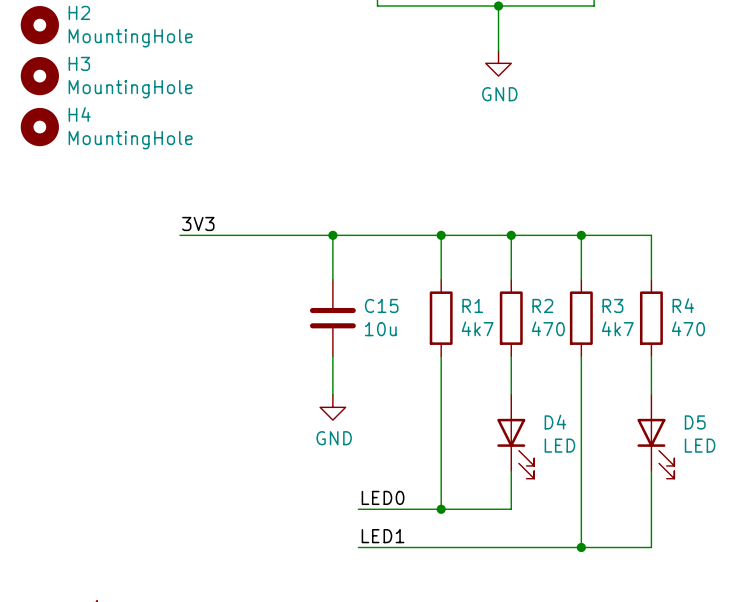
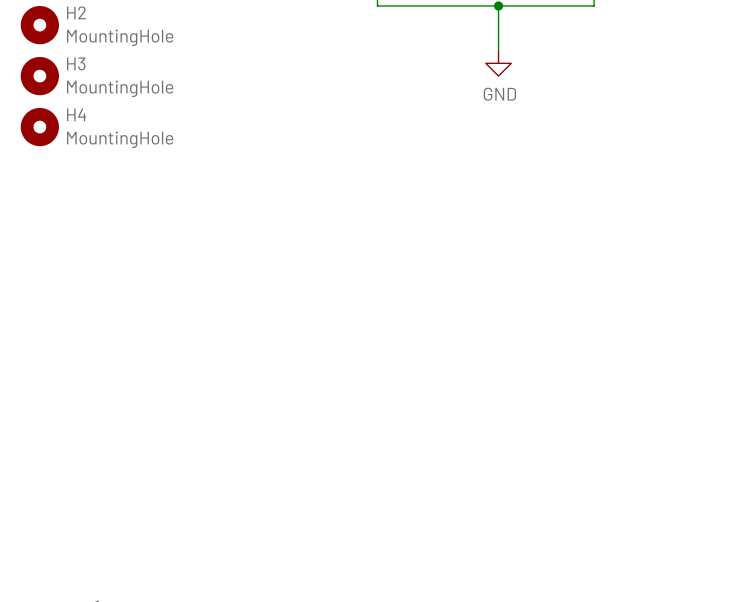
label: 3V3 (198, 223) -> none
wire: (180, 235) (651, 235) (651, 279) -> none
wire: (332, 235) (332, 279) -> none
junction: (332, 235) -> none
wire: (441, 235) (441, 279) -> none
junction: (441, 235) -> none
wire: (511, 235) (511, 279) -> none
junction: (511, 235) -> none
wire: (581, 235) (581, 279) -> none
junction: (581, 235) -> none
C15: 10u (332, 318) -> none
R1: 4k7 (441, 318) -> none
R2: 470 (511, 318) -> none
R3: 4k7 (581, 318) -> none
R4: 470 (651, 318) -> none
wire: (332, 356) (332, 394) -> none
wire: (441, 356) (441, 509) -> none
wire: (511, 356) (511, 394) -> none
wire: (581, 356) (581, 547) -> none
wire: (651, 356) (651, 394) -> none
power symbol: GND (332, 407) -> none
D4: LED (515, 436) -> none
D5: LED (655, 436) -> none
wire: (511, 471) (511, 509) (358, 509) -> none
wire: (651, 471) (651, 547) (358, 547) -> none
label: LED0 (383, 497) -> none
junction: (441, 509) -> none
label: LED1 (383, 536) -> none
junction: (581, 547) -> none

